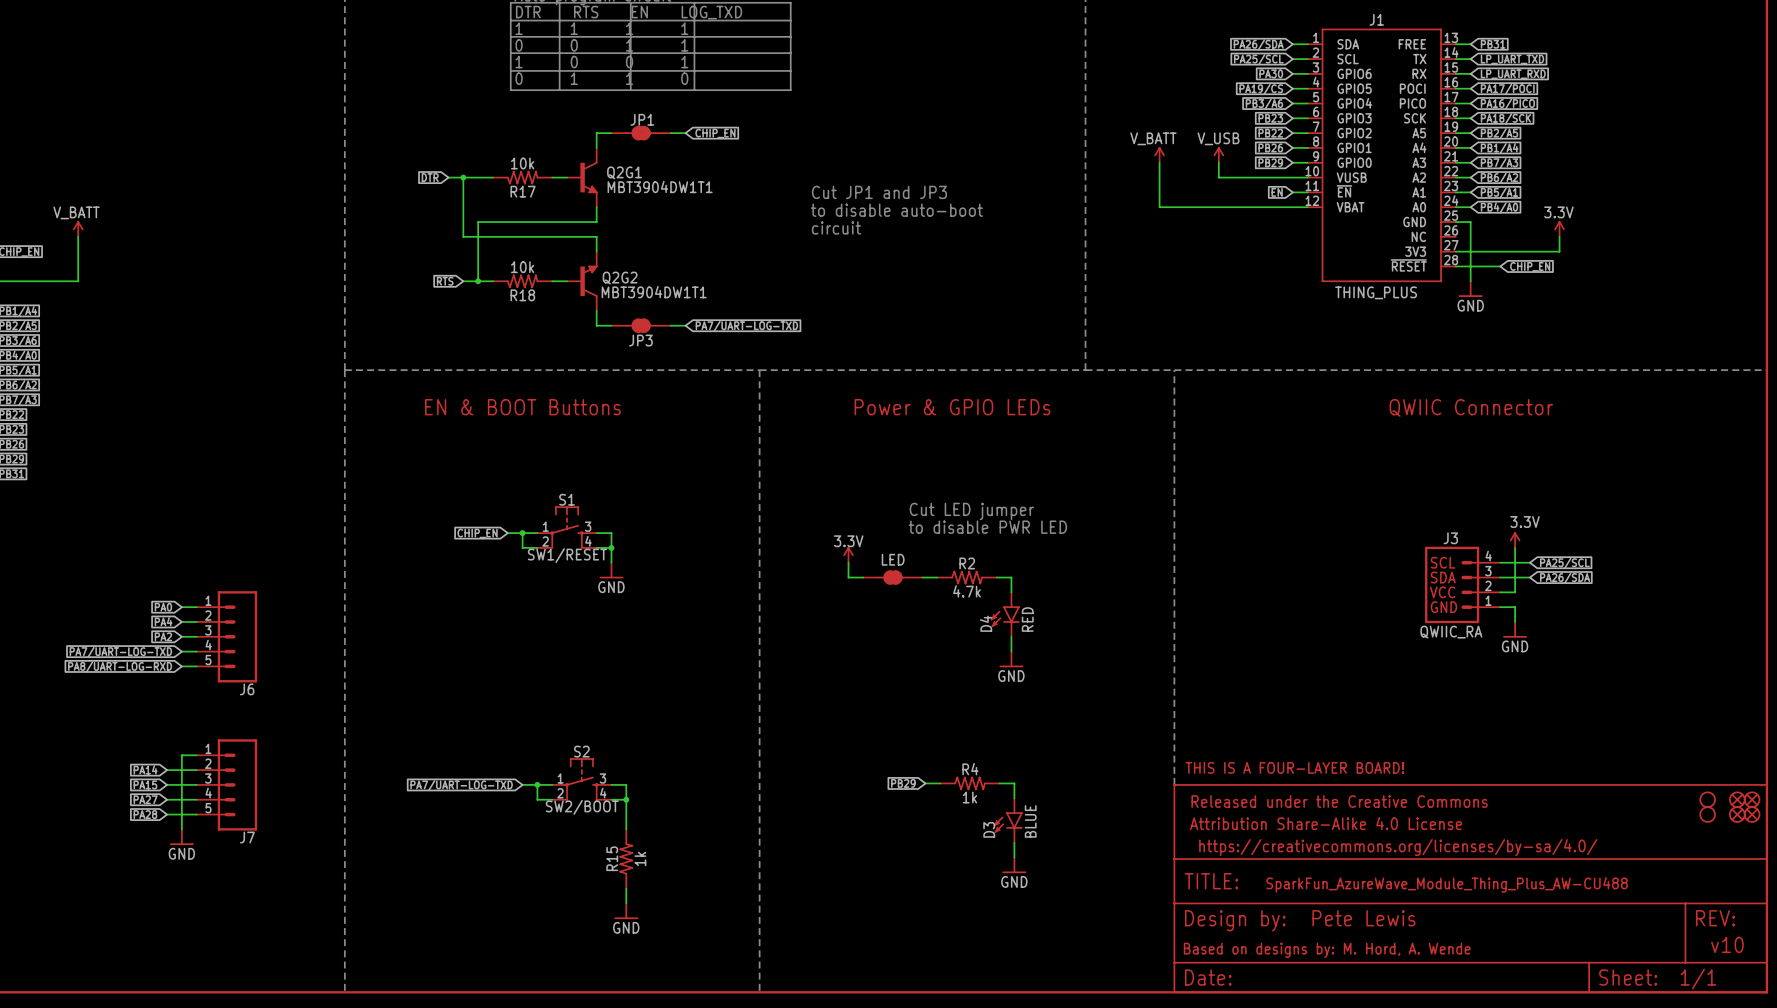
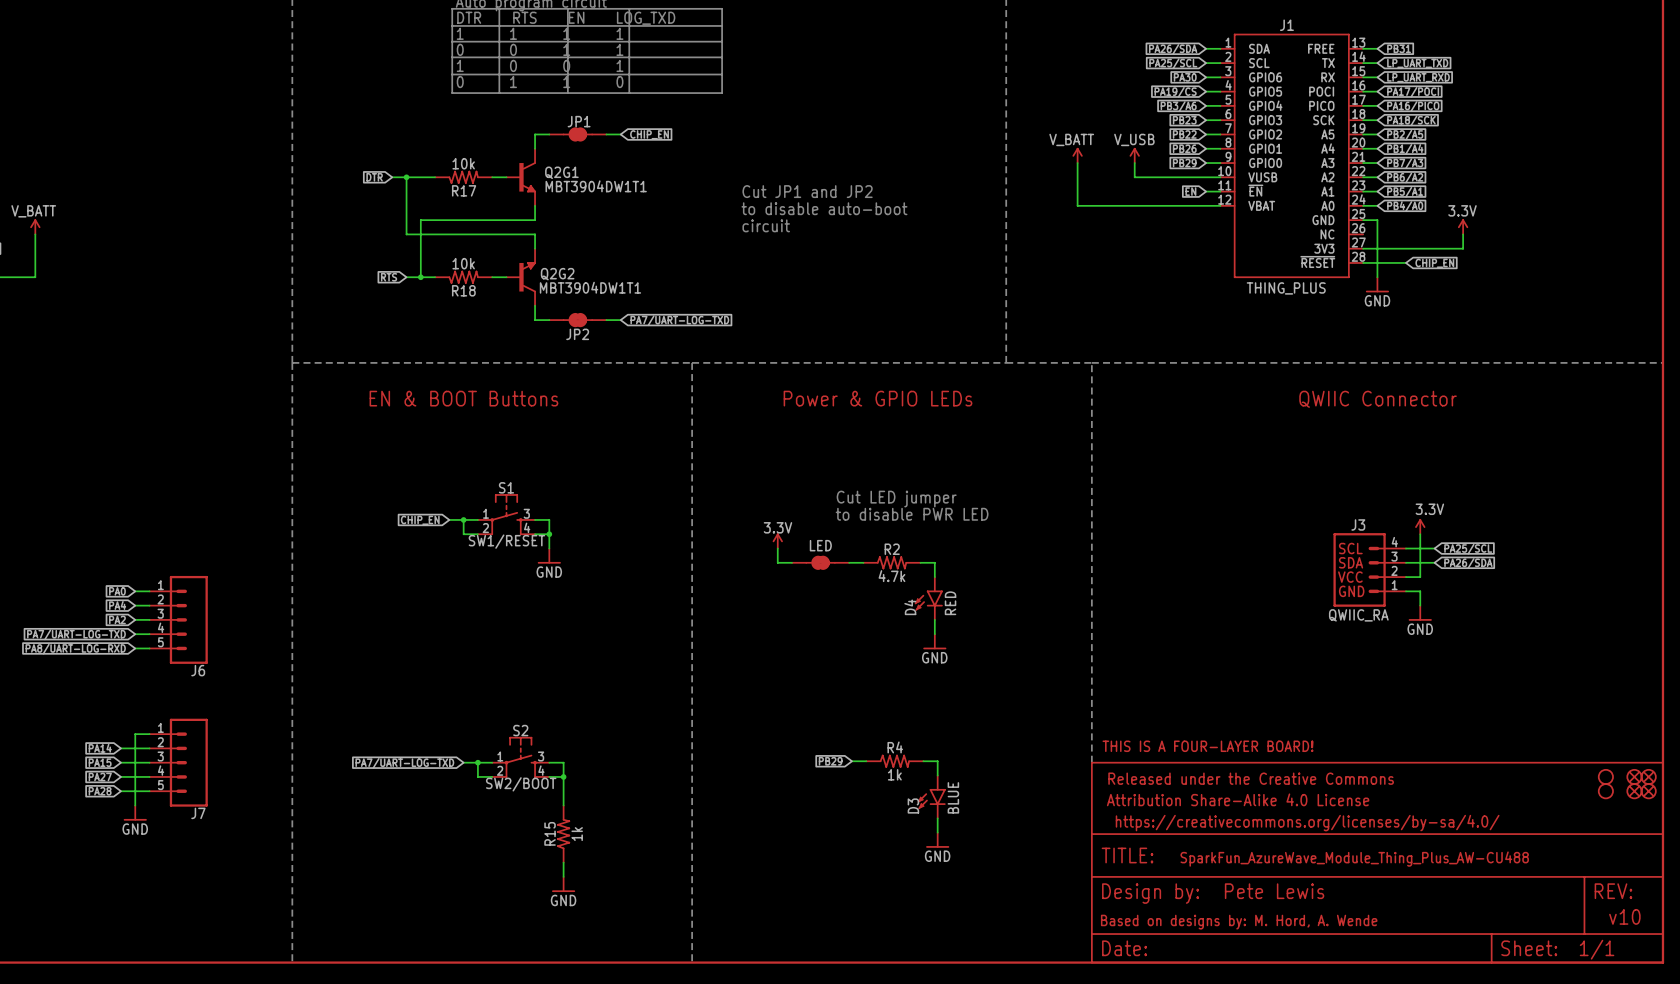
text: Cut JP1 and JP3 (879, 192) -> Cut JP1 and JP2 (807, 191)
JP3 name: JP3 (640, 340) -> JP2 (577, 334)

